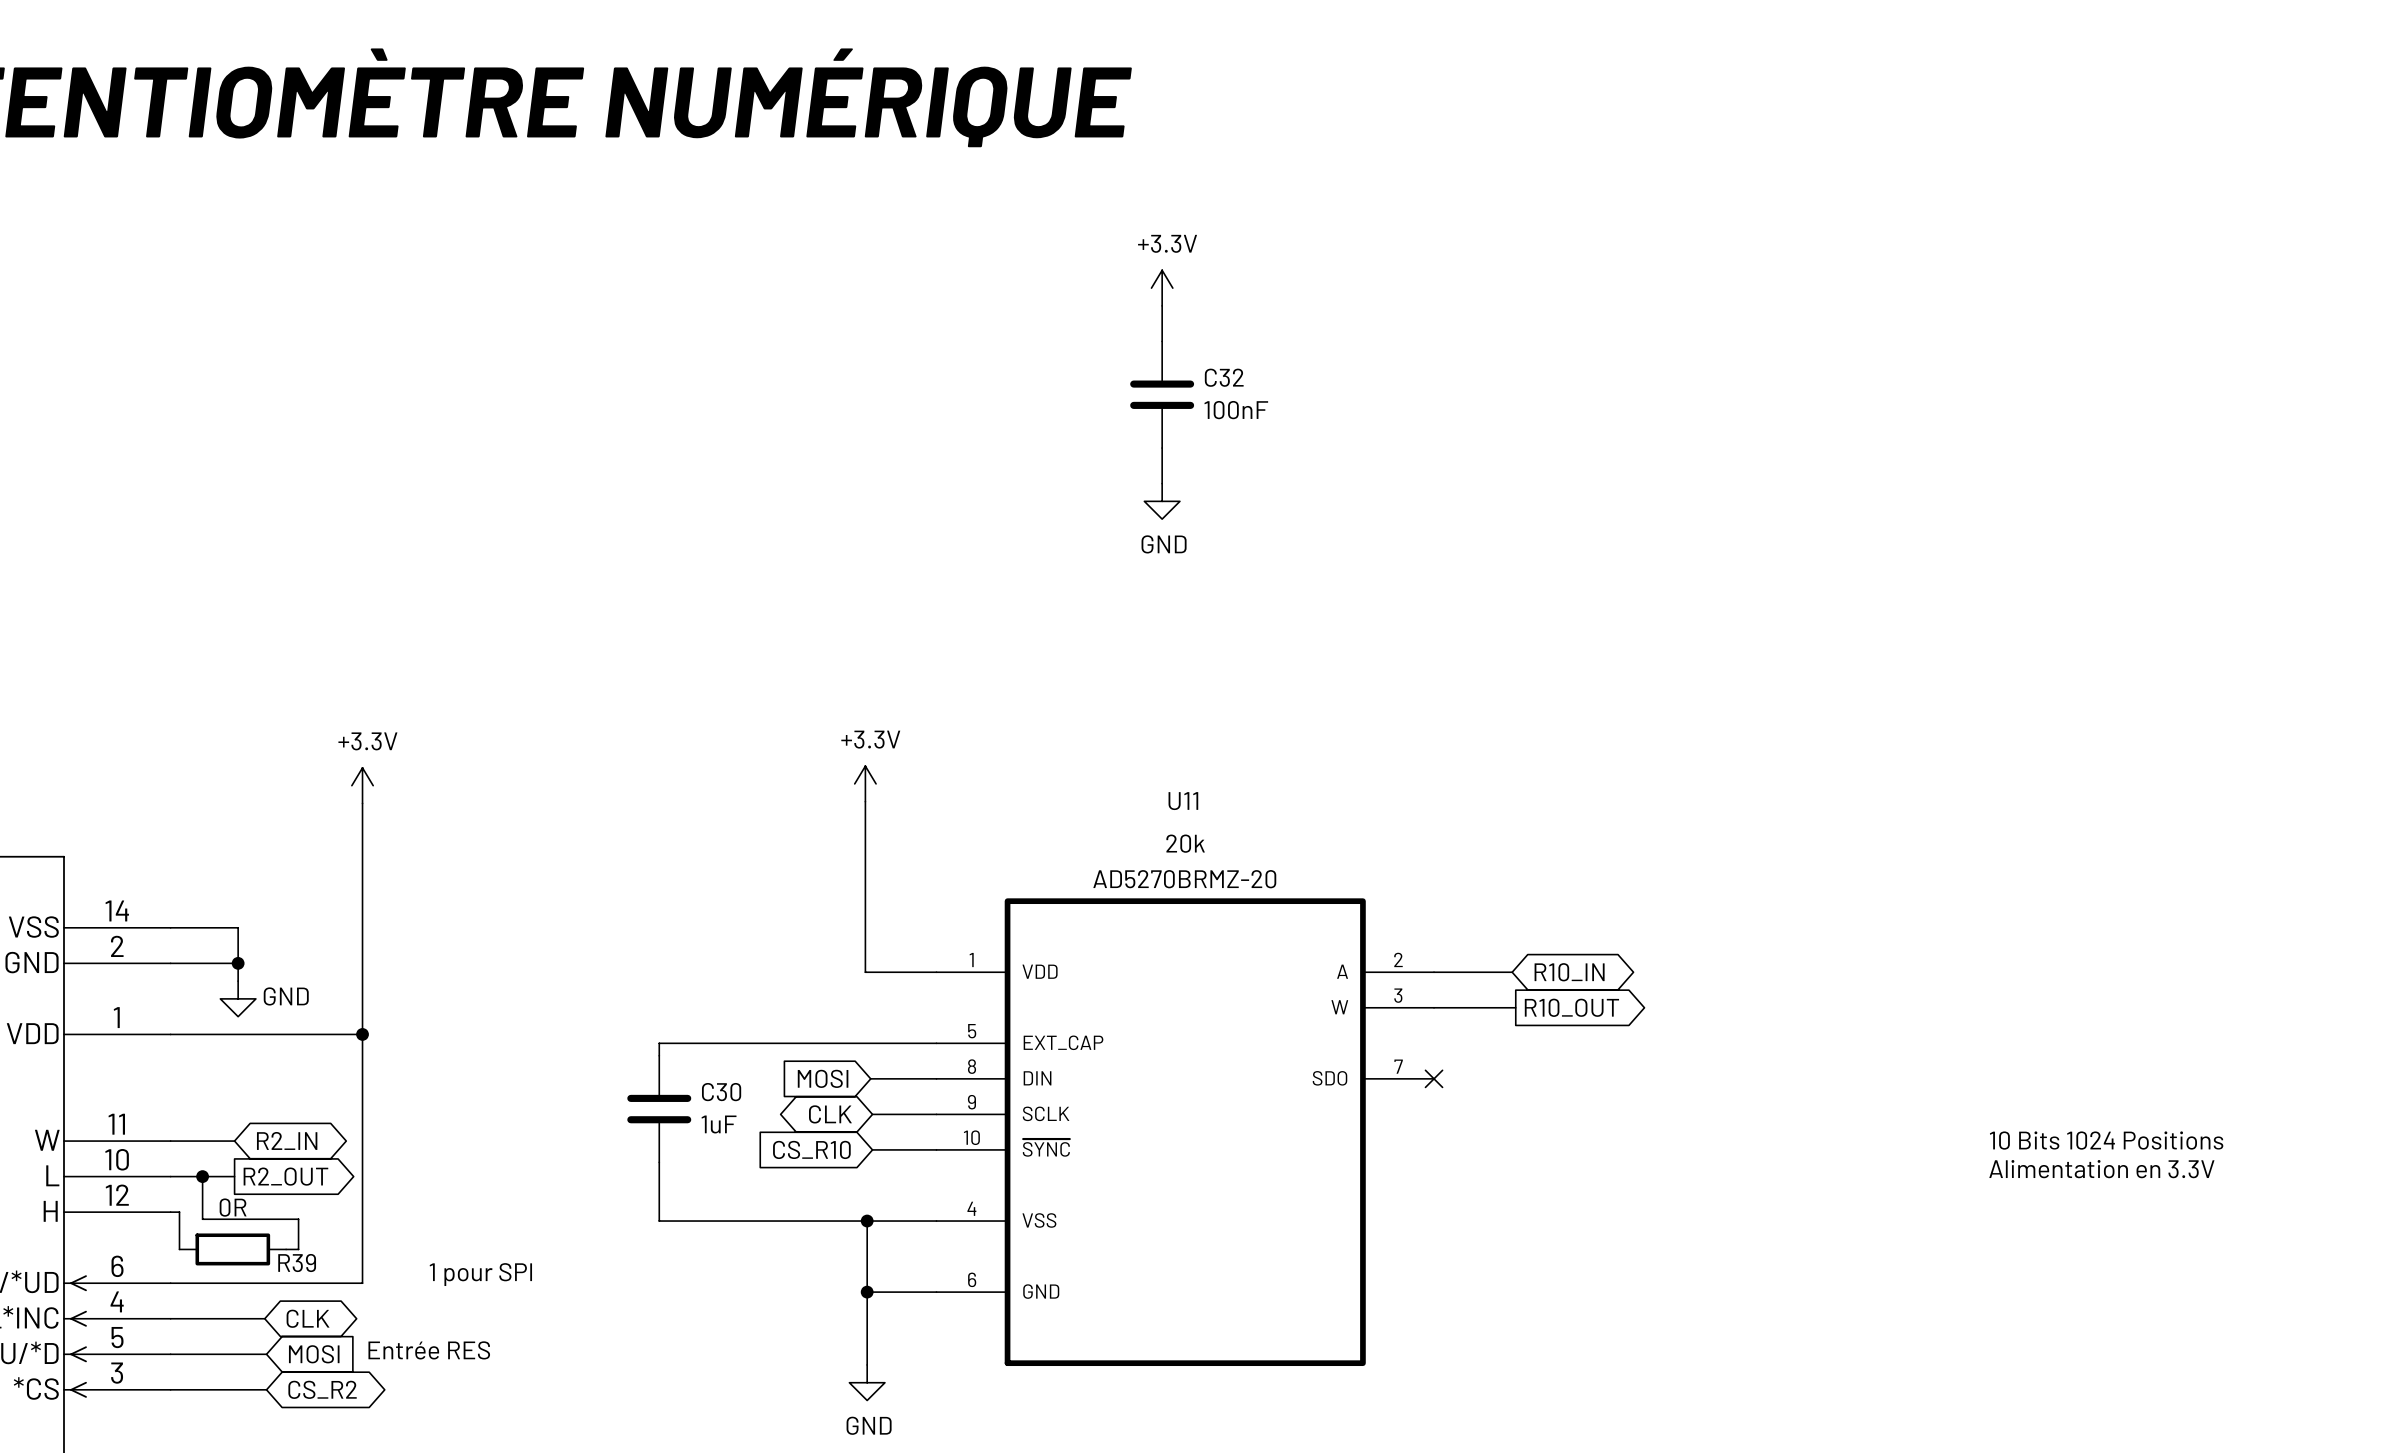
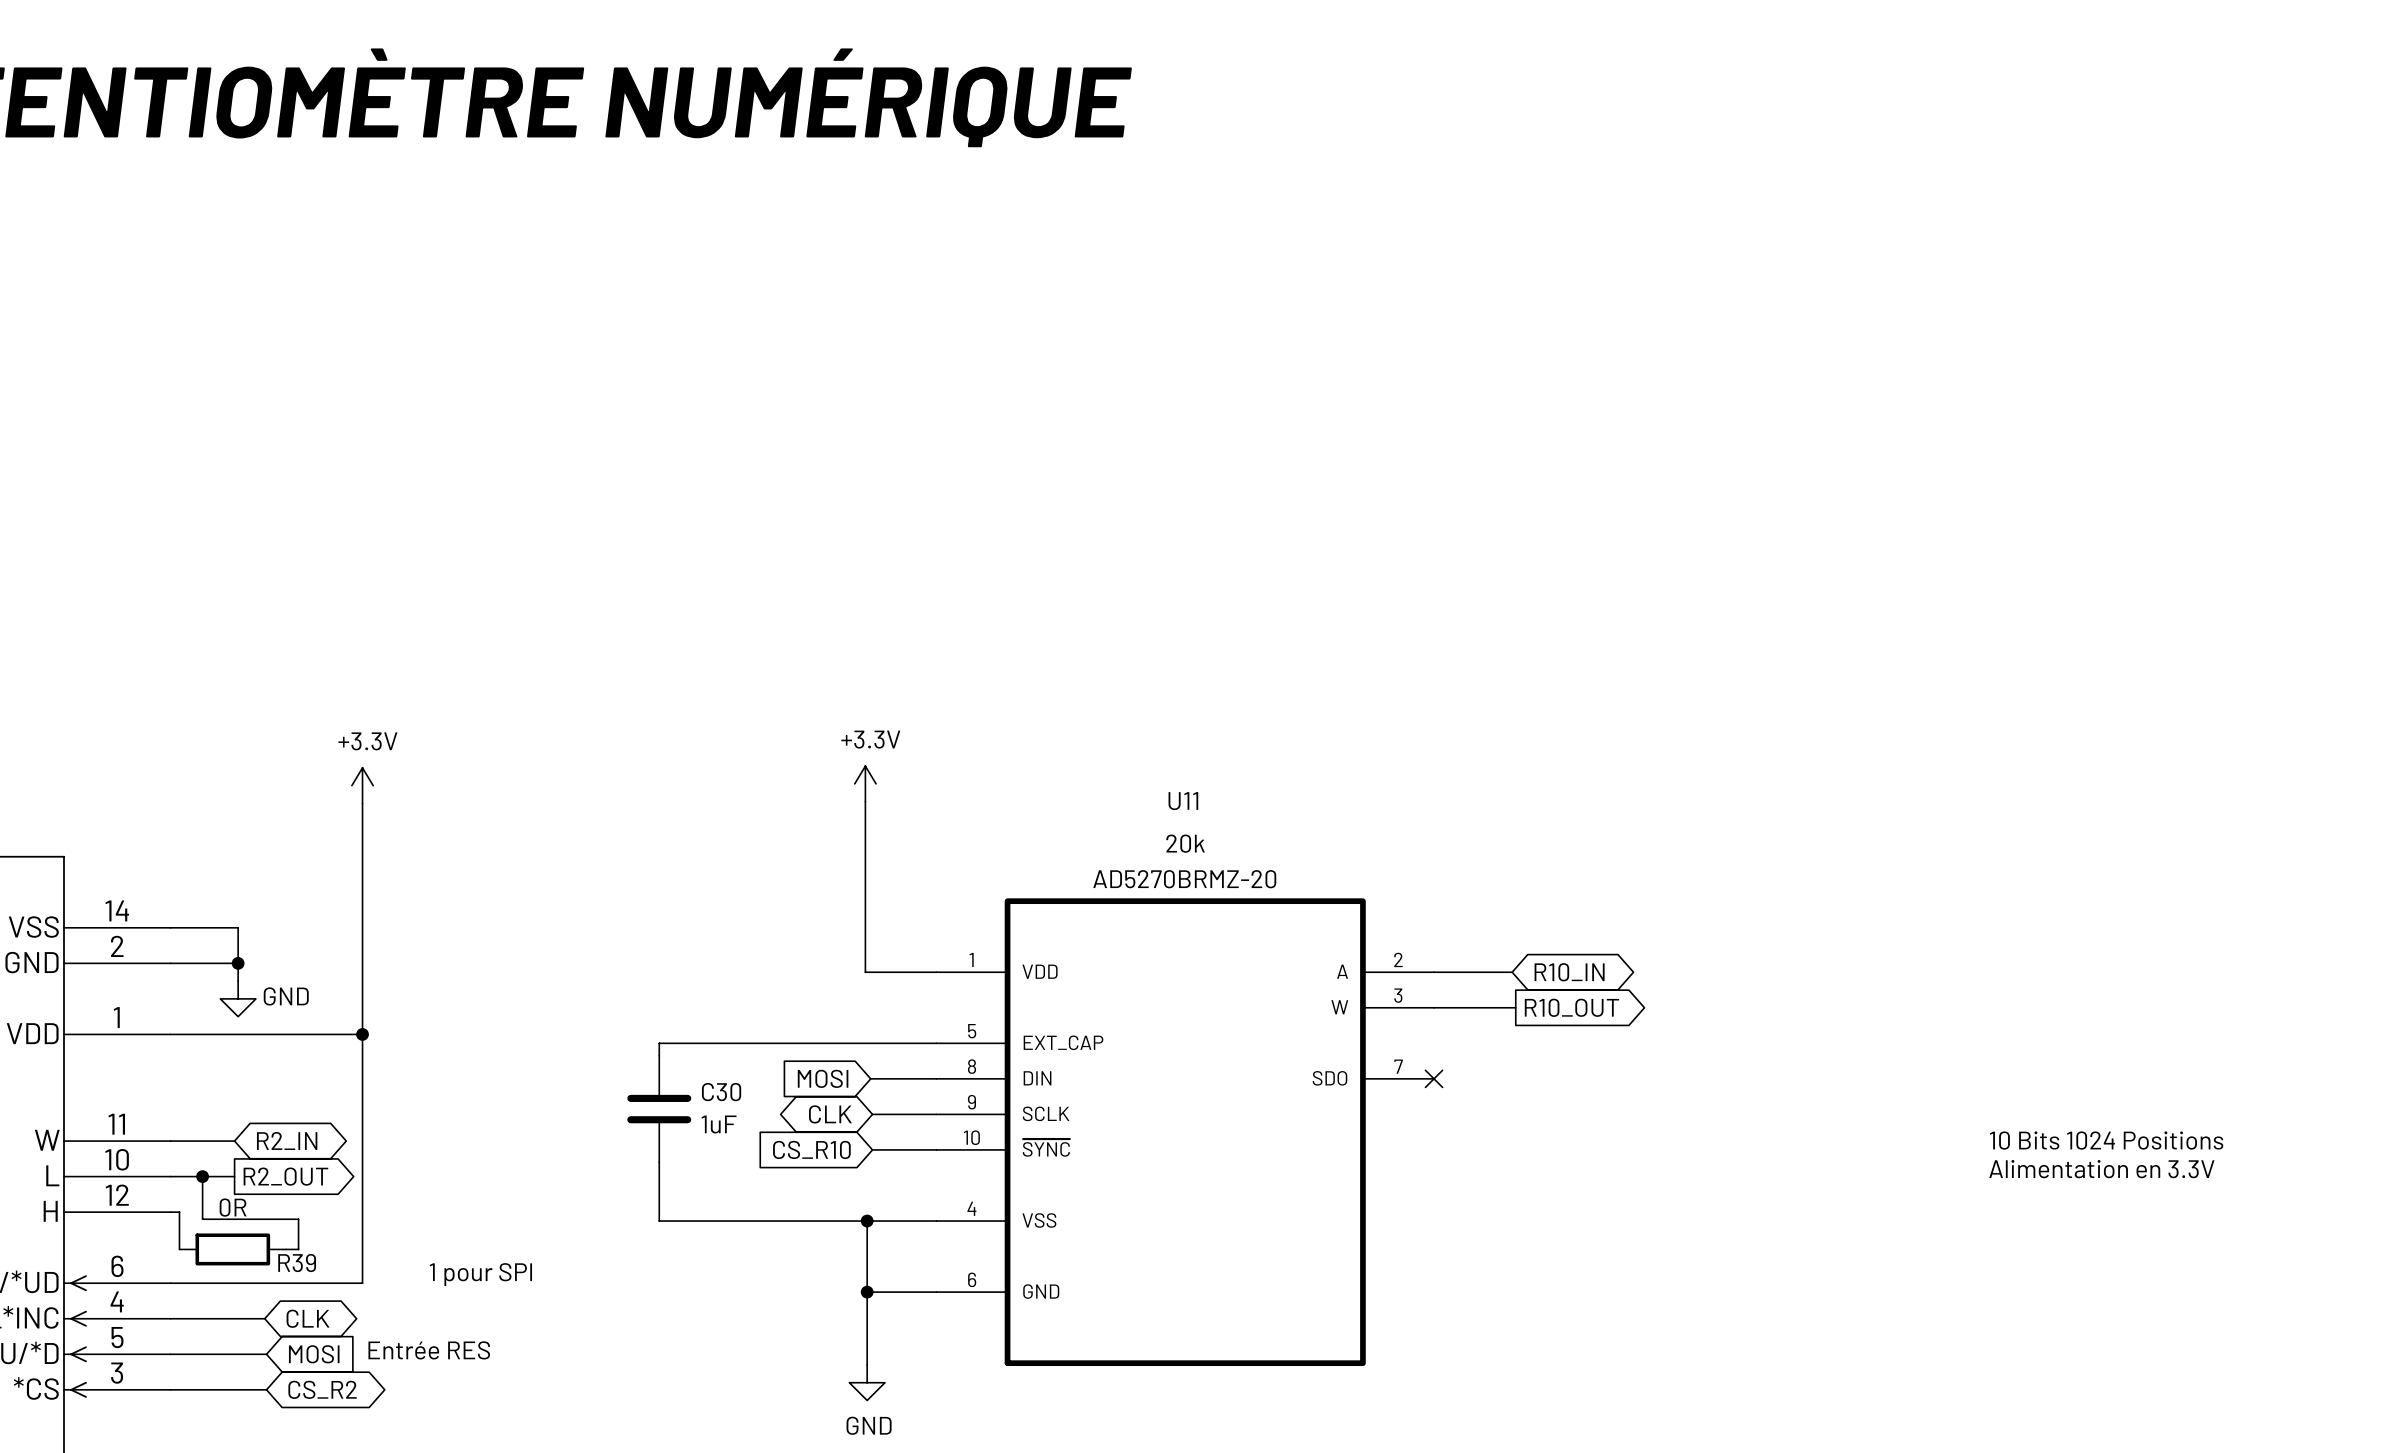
power symbol: +3.3V (1162, 288) -> none
wire: (1162, 305) (1162, 341) -> none
C32: 100nF (1162, 394) -> none
wire: (1162, 448) (1162, 483) -> none
power symbol: GND (1162, 501) -> none

